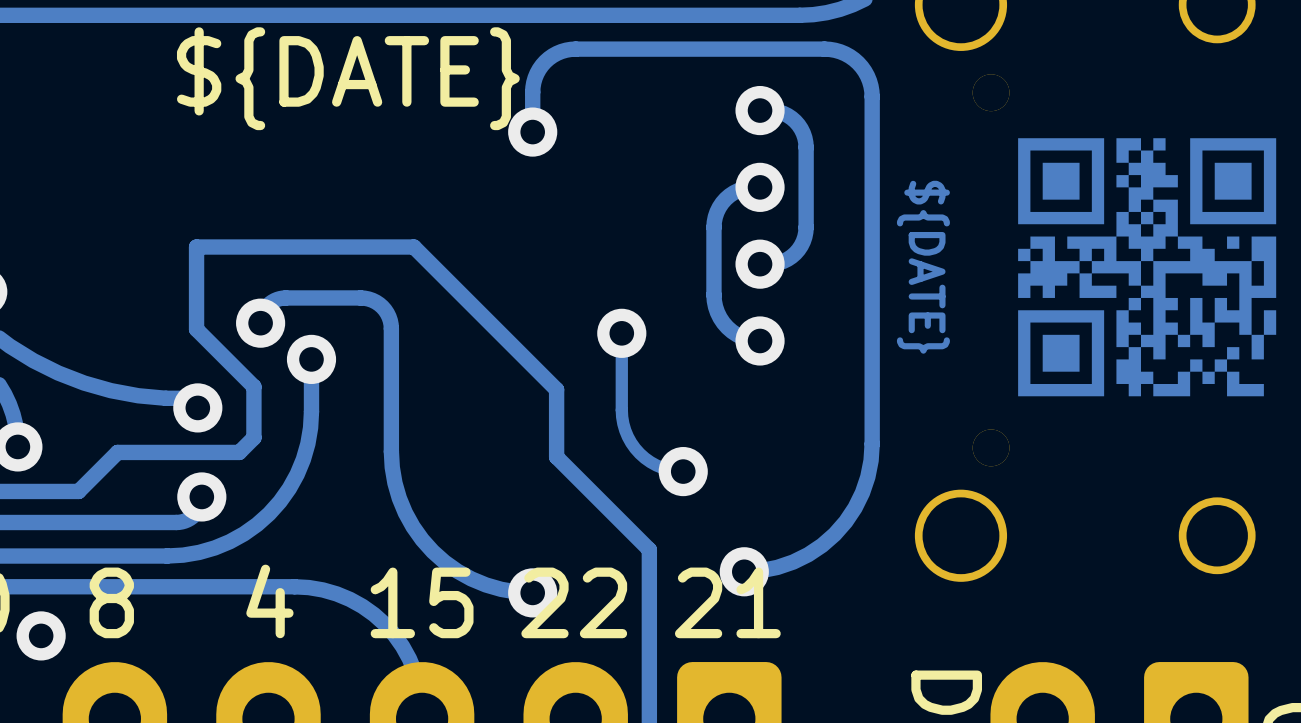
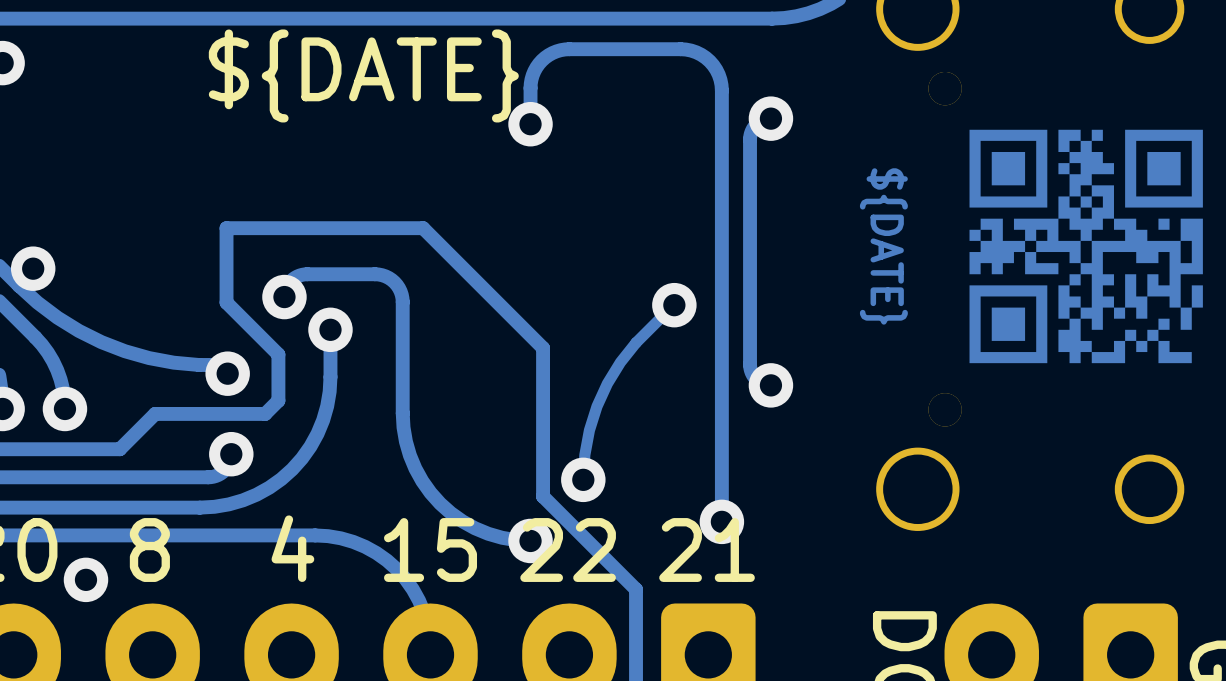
track: (698, 49) (835, 50) (849, 56) (861, 67) (869, 81) (871, 91) (872, 443) (867, 476) (855, 507) (845, 521) (822, 545) (793, 562) (777, 567) (744, 571) -> (680, 49) (691, 50) (705, 57) (716, 69) (721, 85) (721, 521)
track: (760, 110) (778, 111) (791, 118) (801, 128) (806, 147) (806, 227) (803, 241) (798, 249) (787, 259) (774, 263) (760, 264) -> none
via position: (760, 110) -> (770, 118)
track: none -> (770, 118) (762, 120) (756, 124) (751, 131) (750, 139) (750, 367) (756, 379) (762, 383) (770, 385)
track: (760, 187) (743, 188) (729, 195) (719, 207) (713, 227) (713, 294) (717, 312) (727, 327) (737, 334) (748, 339) (760, 340) -> none
via: (760, 187) -> none
via: (760, 264) -> none
track: none -> (673, 305) (636, 342) (620, 362) (607, 383) (596, 406) (589, 430) (584, 454) (583, 479)
via: none -> (674, 305)
track: (621, 333) (622, 417) (627, 436) (635, 448) (650, 462) (669, 470) (683, 471) -> none
via: (621, 333) -> none
via: (760, 340) -> none
track: (546, 379) (556, 389) (556, 457) (649, 549) (649, 646) -> (543, 348) (543, 496) (636, 589)
via: none -> (770, 385)
via: (683, 471) -> none
via: none -> (583, 479)

